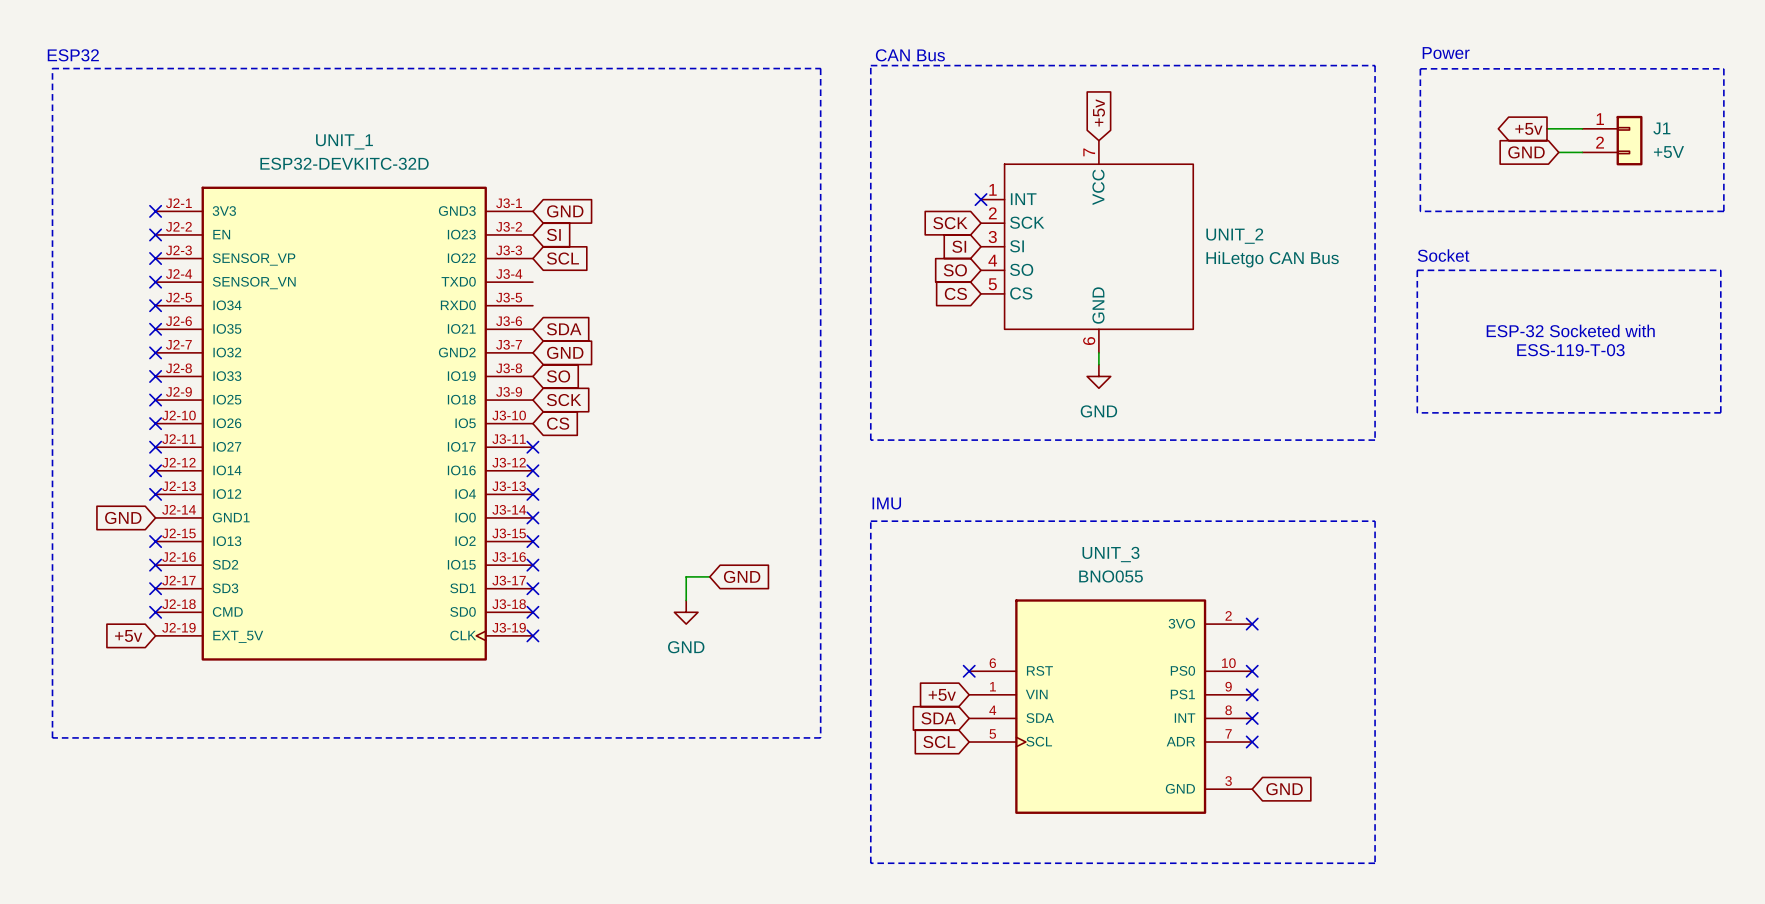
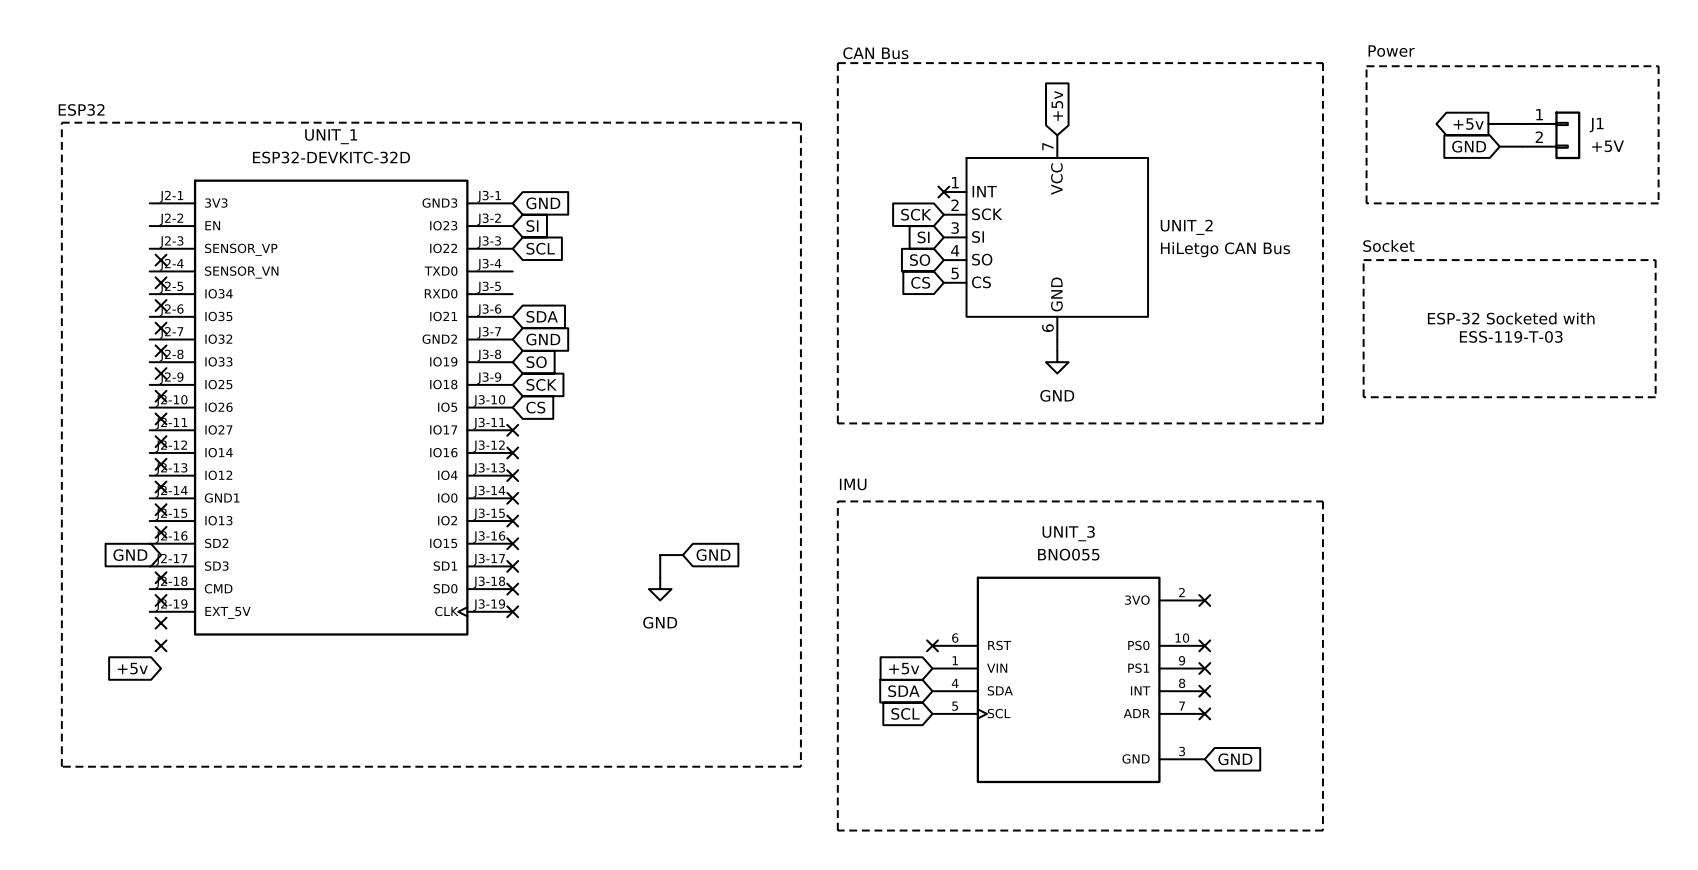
text position: ESP32 (73, 55) -> ESP32 (81, 109)
line: (52, 68) (820, 68) (820, 737) (52, 737) (52, 68) -> (61, 122) (800, 122) (800, 766) (61, 766) (61, 122)
no-connect mark: (155, 211) -> none
no-connect mark: (155, 234) -> none
no-connect mark: (155, 258) -> none
no-connect mark: none -> (161, 260)
no-connect mark: (155, 282) -> none
no-connect mark: none -> (161, 282)
no-connect mark: (155, 305) -> none
no-connect mark: none -> (161, 305)
no-connect mark: (155, 329) -> none
no-connect mark: none -> (161, 328)
no-connect mark: (155, 352) -> none
no-connect mark: none -> (161, 350)
no-connect mark: (155, 376) -> none
no-connect mark: none -> (161, 373)
no-connect mark: (155, 400) -> none
no-connect mark: none -> (161, 396)
no-connect mark: (155, 423) -> none
no-connect mark: none -> (161, 418)
no-connect mark: (155, 447) -> none
no-connect mark: none -> (161, 441)
no-connect mark: (155, 470) -> none
no-connect mark: none -> (161, 464)
no-connect mark: (155, 494) -> none
no-connect mark: none -> (161, 487)
global label position: GND (123, 517) -> GND (130, 555)
no-connect mark: none -> (161, 509)
no-connect mark: (155, 541) -> none
no-connect mark: none -> (161, 532)
no-connect mark: (155, 565) -> none
no-connect mark: (155, 588) -> none
no-connect mark: none -> (161, 577)
no-connect mark: (155, 612) -> none
no-connect mark: none -> (161, 600)
global label position: +5v (128, 635) -> +5v (132, 668)
no-connect mark: none -> (161, 623)
no-connect mark: none -> (161, 645)

